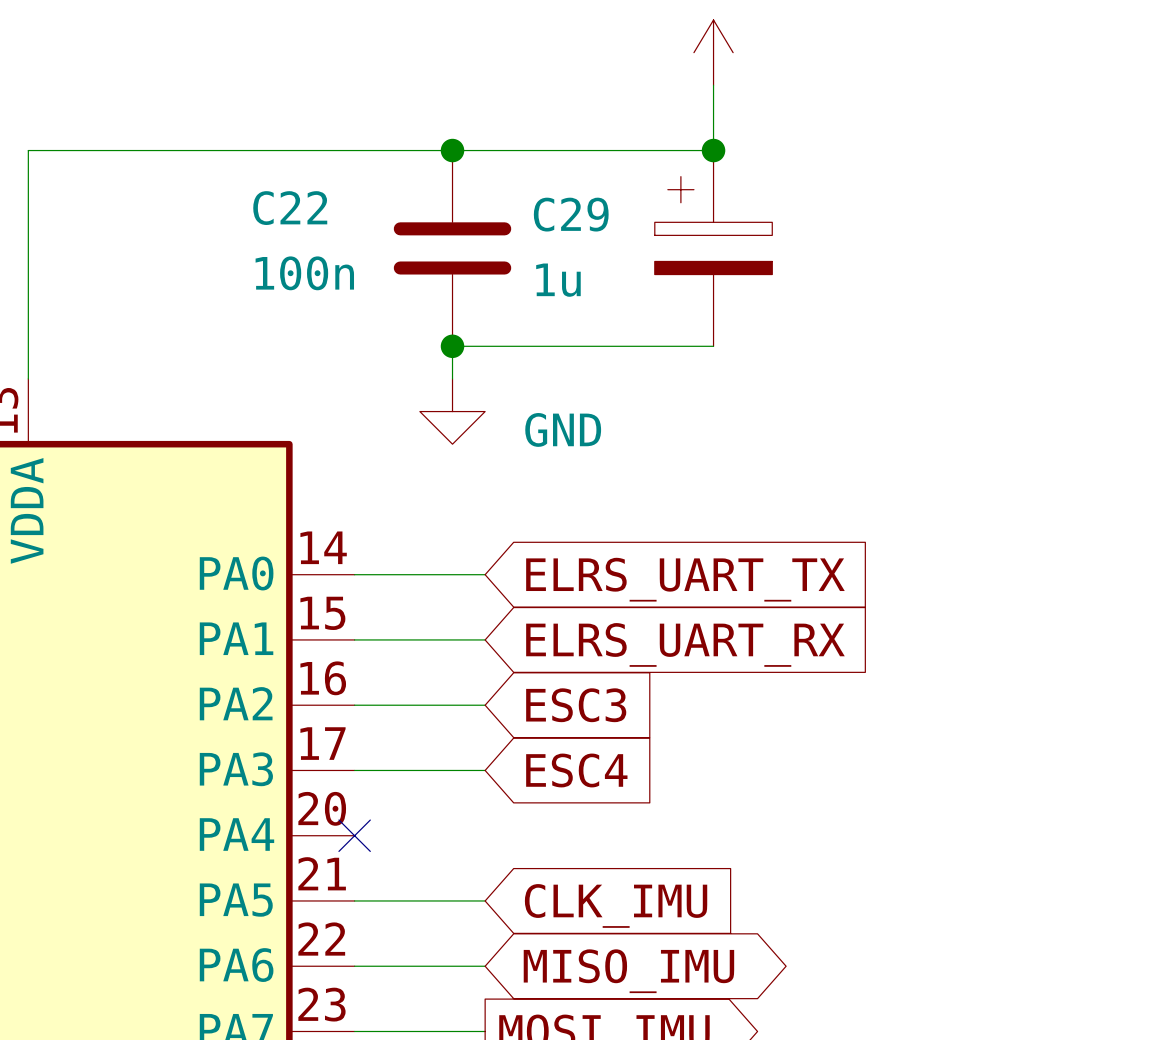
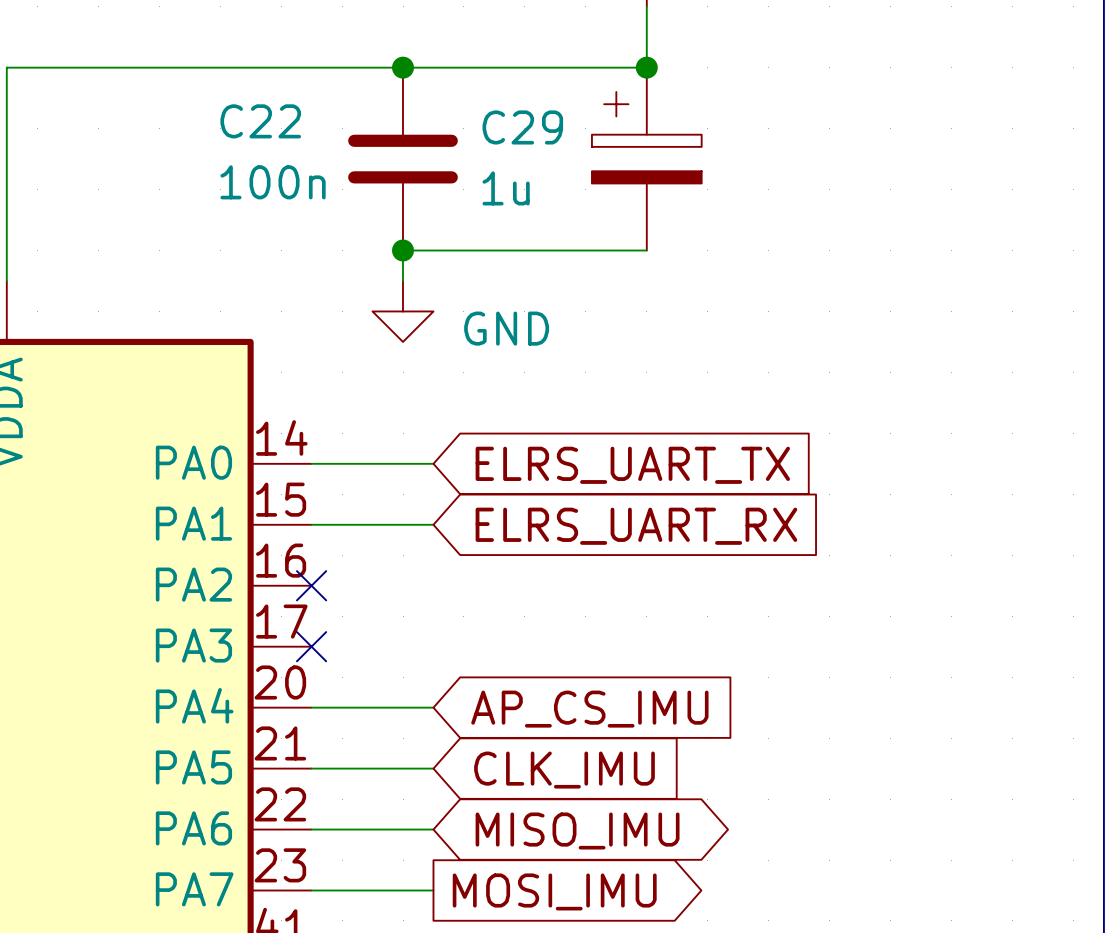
wire: (354, 705) (485, 705) -> none
no-connect mark: none -> (311, 585)
global label: ESC3 (576, 705) -> none
wire: (354, 770) (485, 770) -> (311, 707) (433, 707)
no-connect mark: none -> (311, 646)
global label: ESC4 (576, 770) -> none
no-connect mark: (354, 835) -> none
global label: none -> AP_CS_IMU (589, 709)

